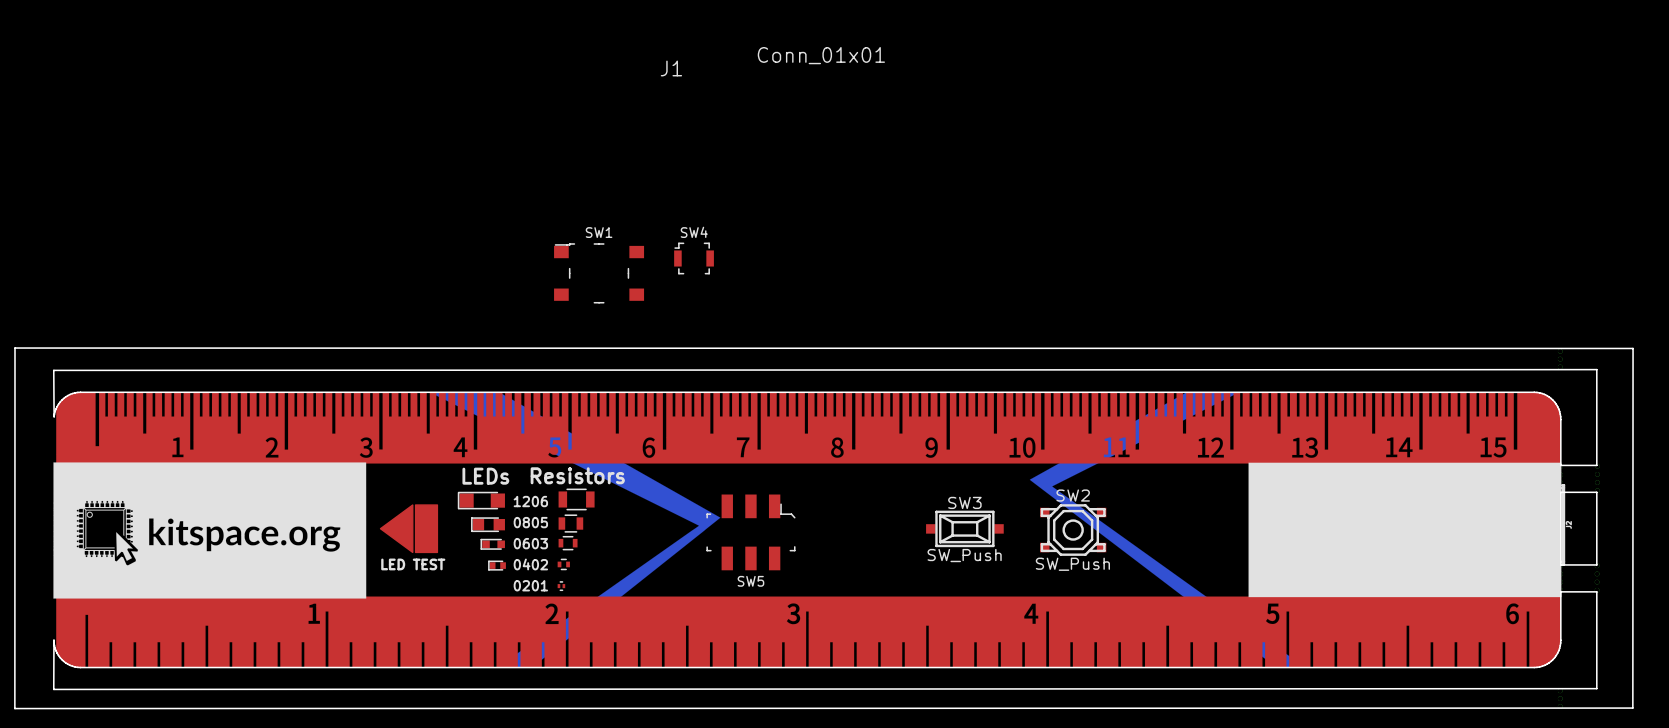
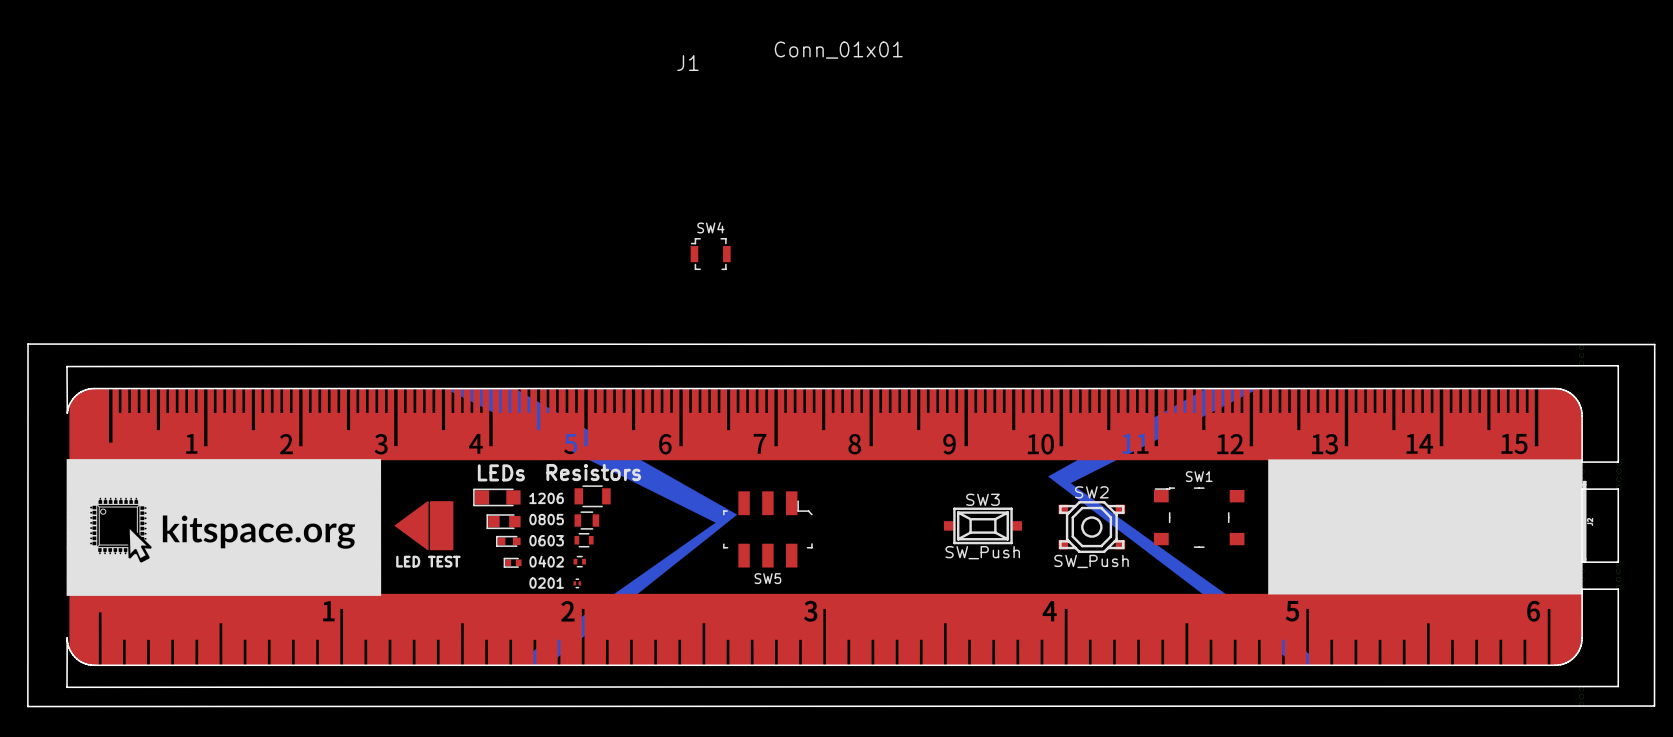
SW1 position: (599, 273) -> (1199, 517)

